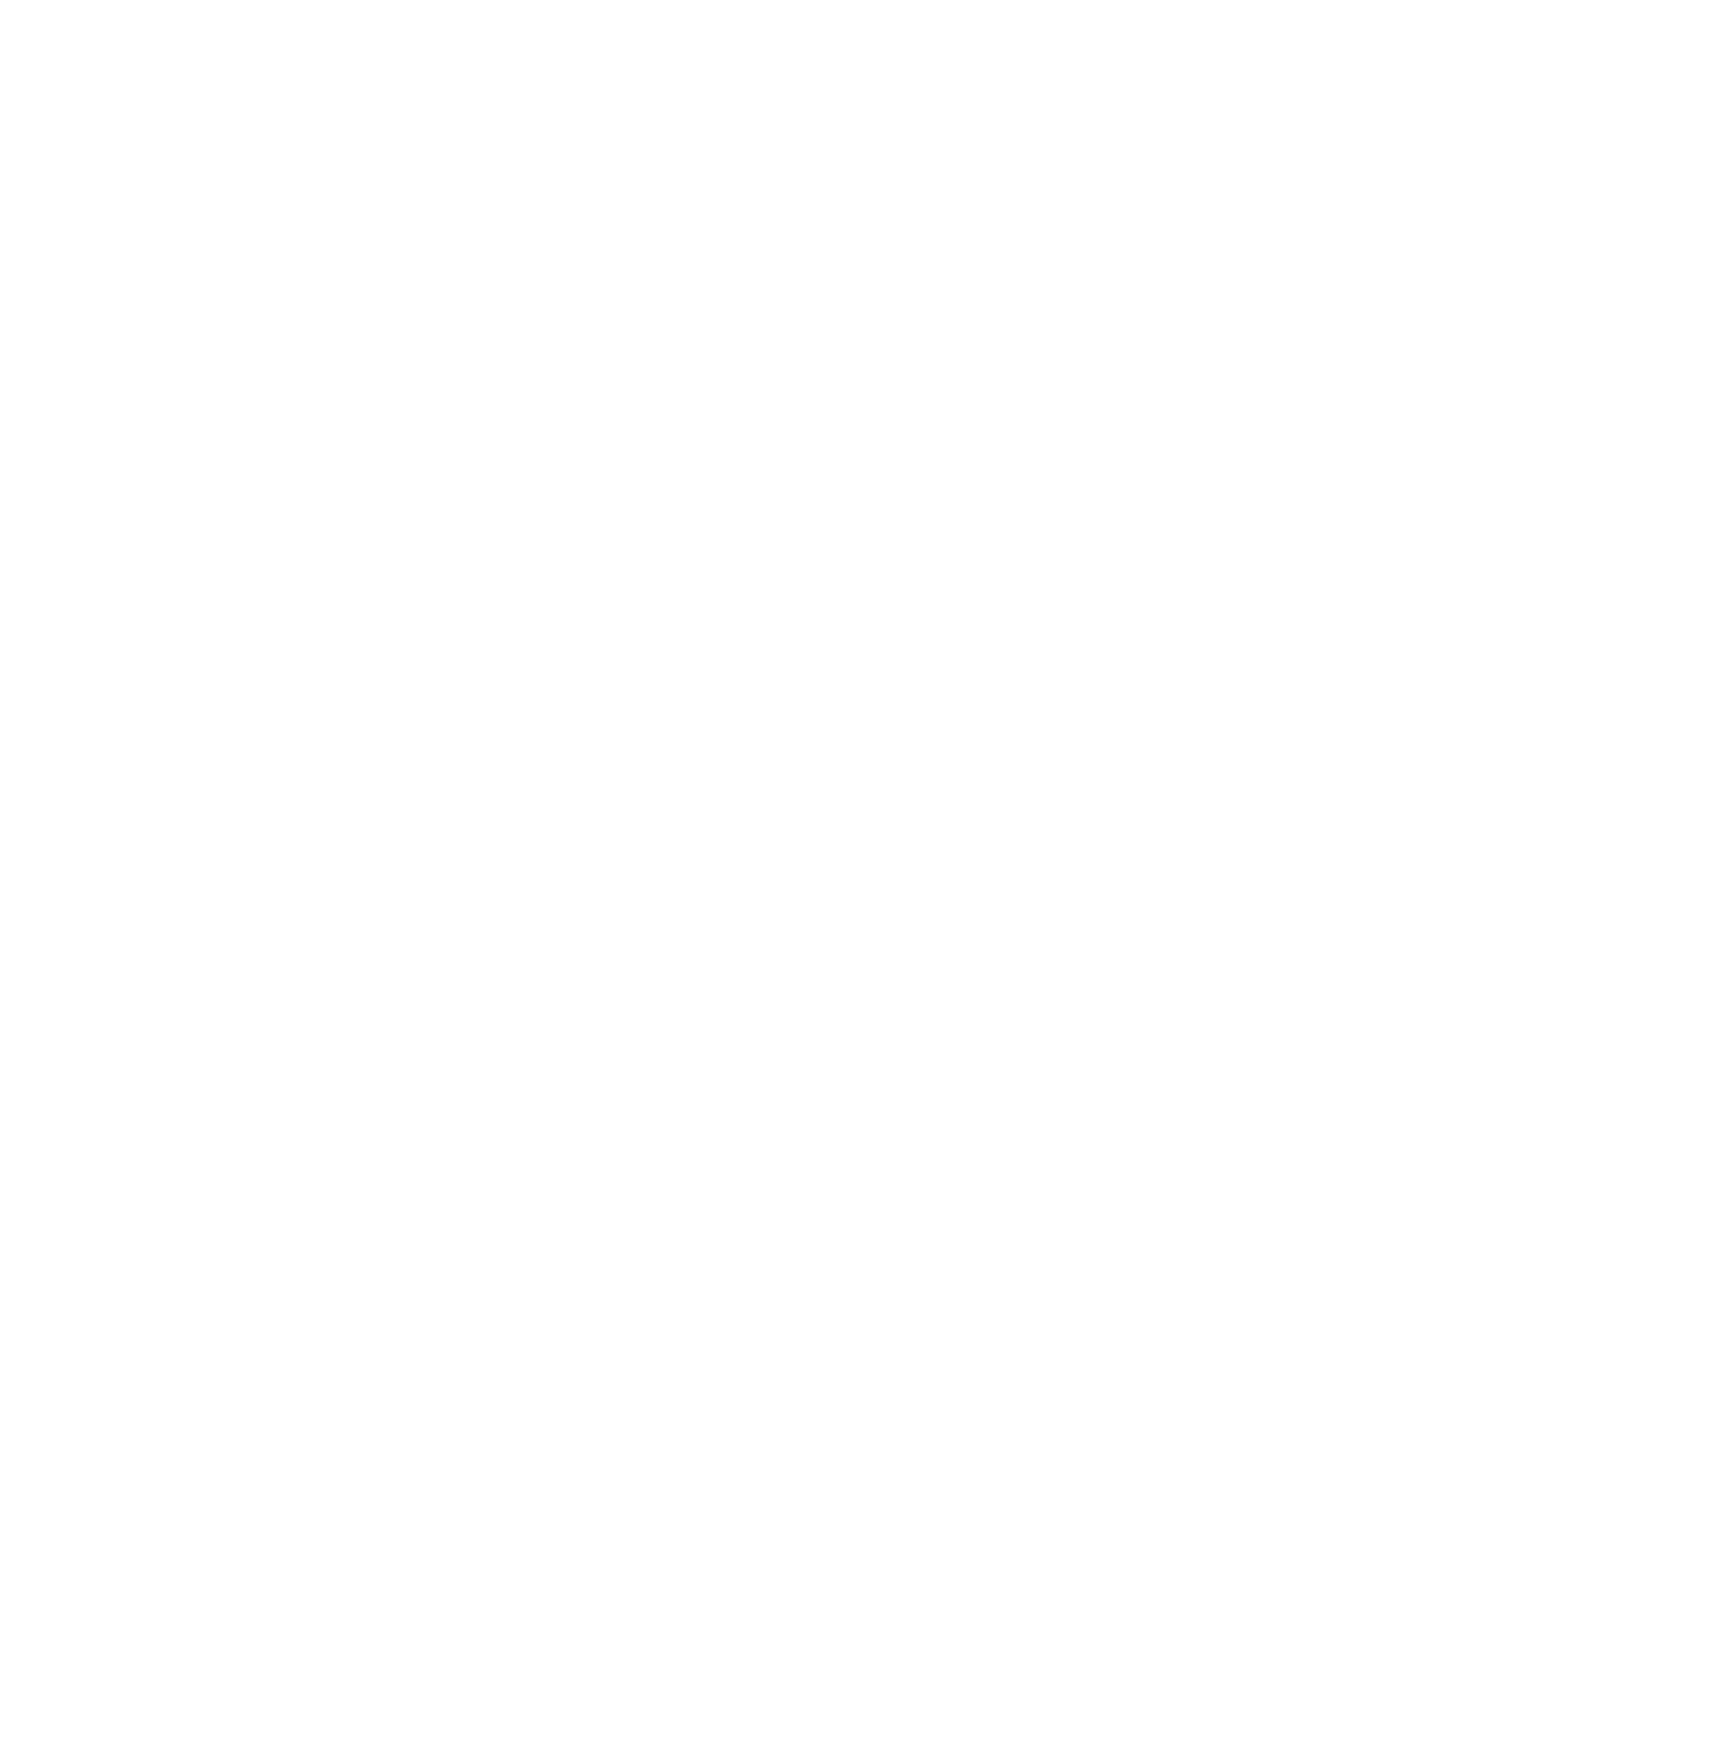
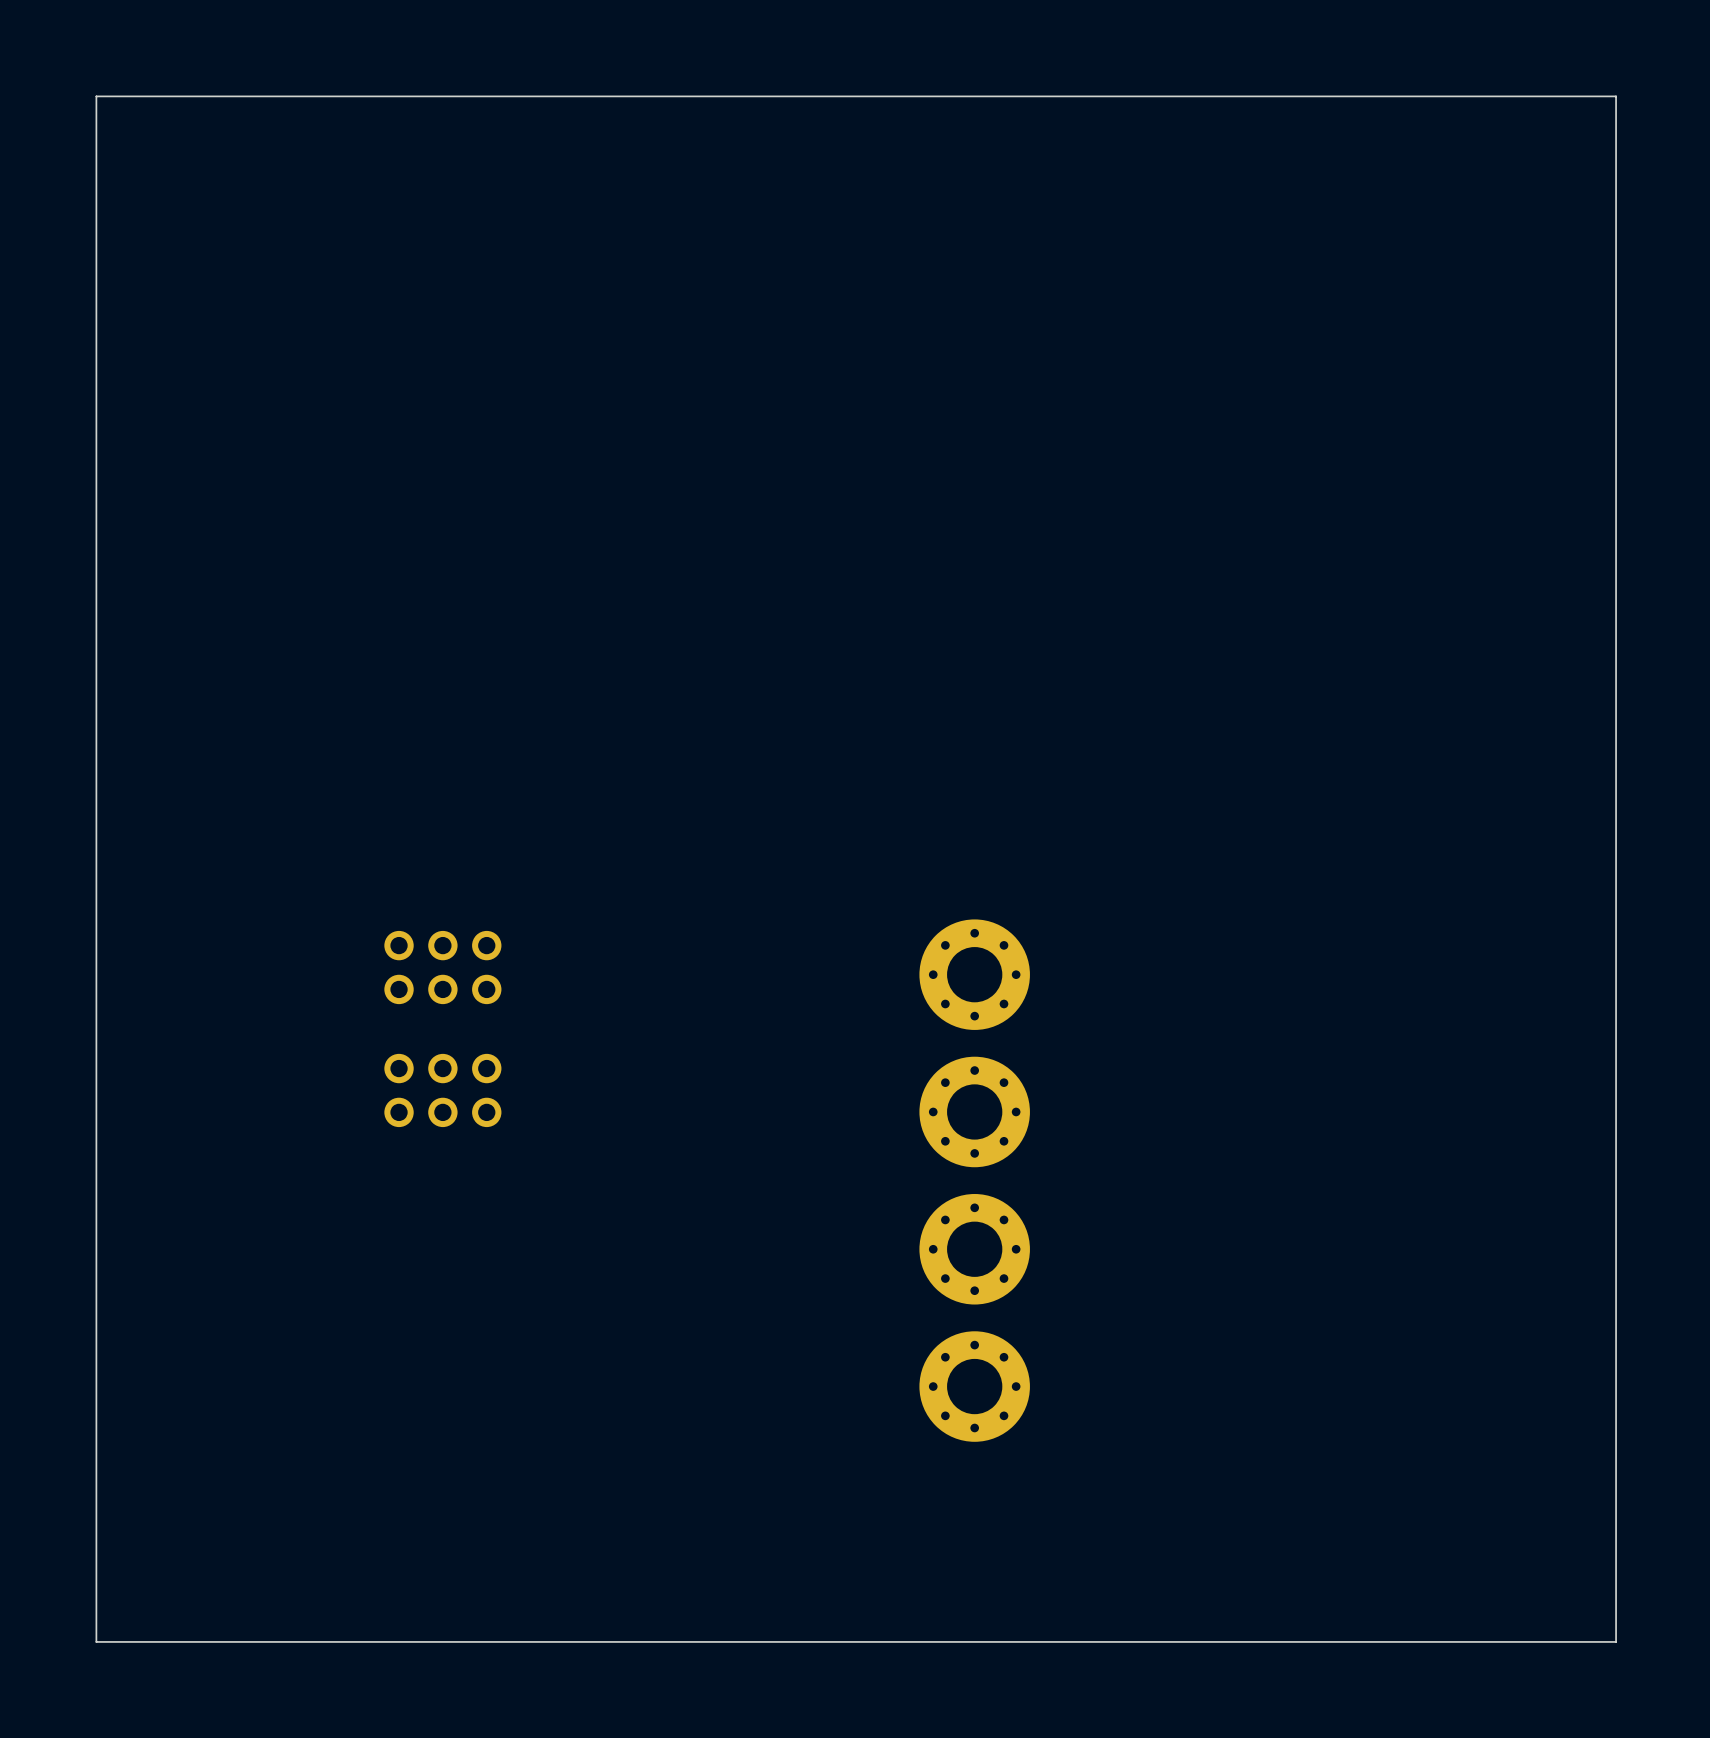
board edge: none -> (1616, 96) (96, 96) (96, 1641) (1616, 1641) (1616, 96)
part: none -> (442, 967)
part: none -> (974, 974)
part: none -> (442, 1090)
part: none -> (974, 1111)
part: none -> (974, 1249)
part: none -> (974, 1386)

